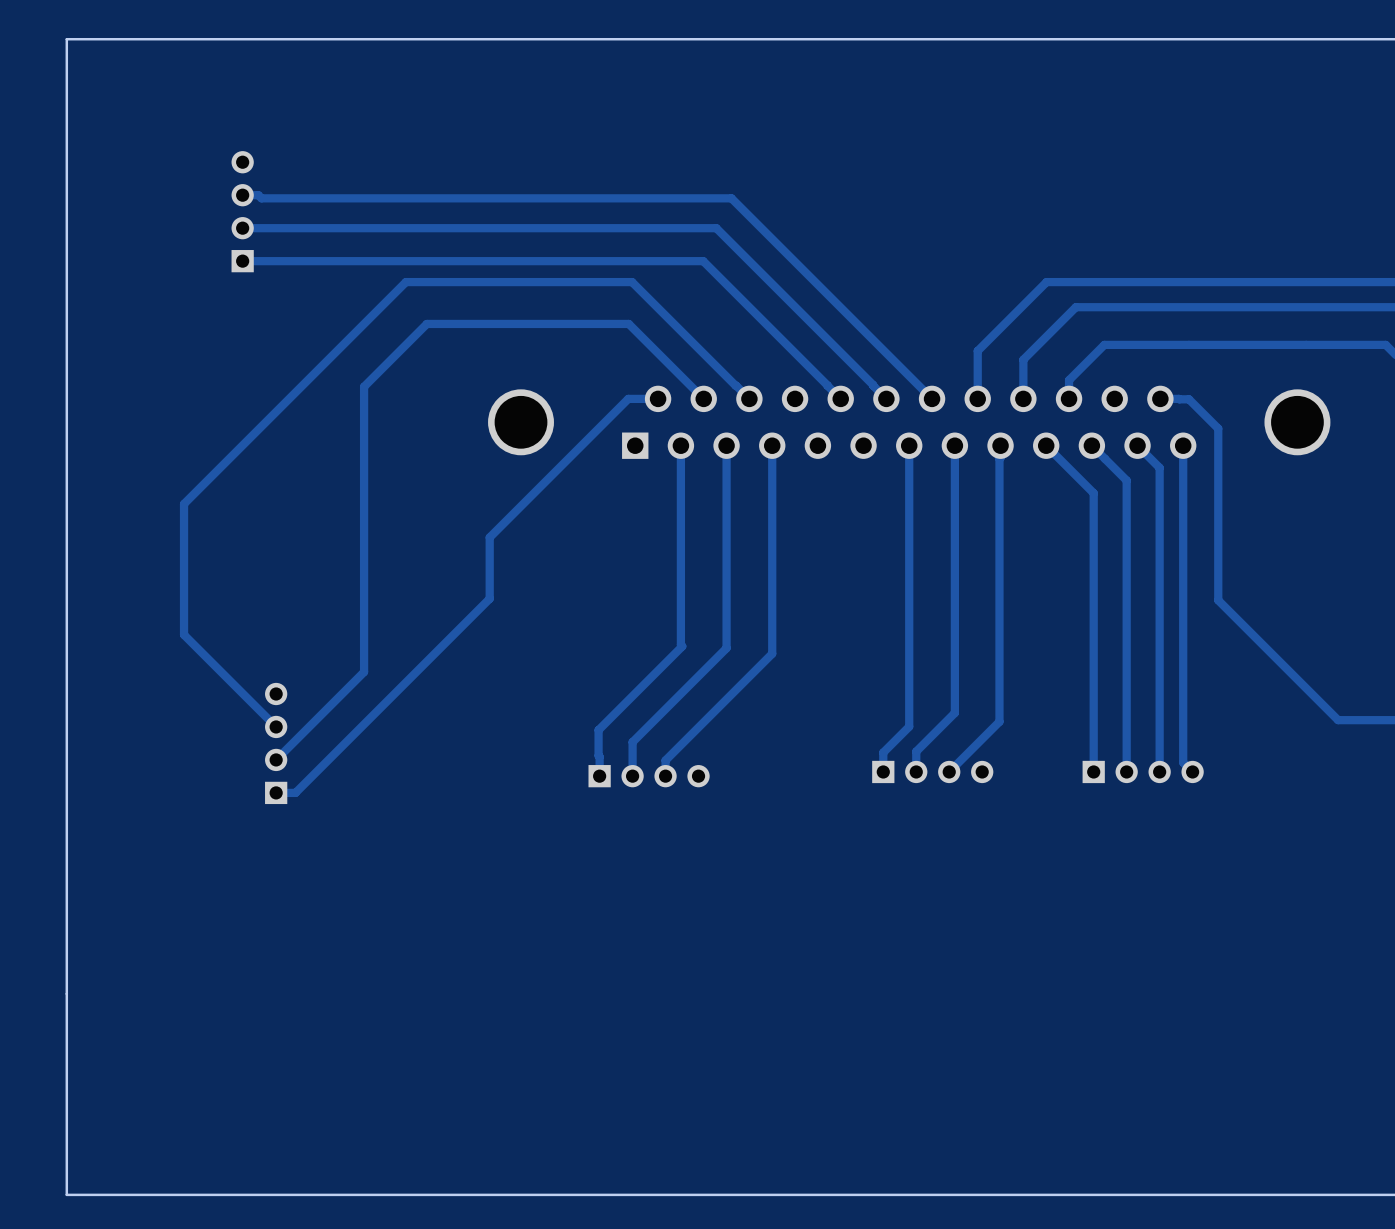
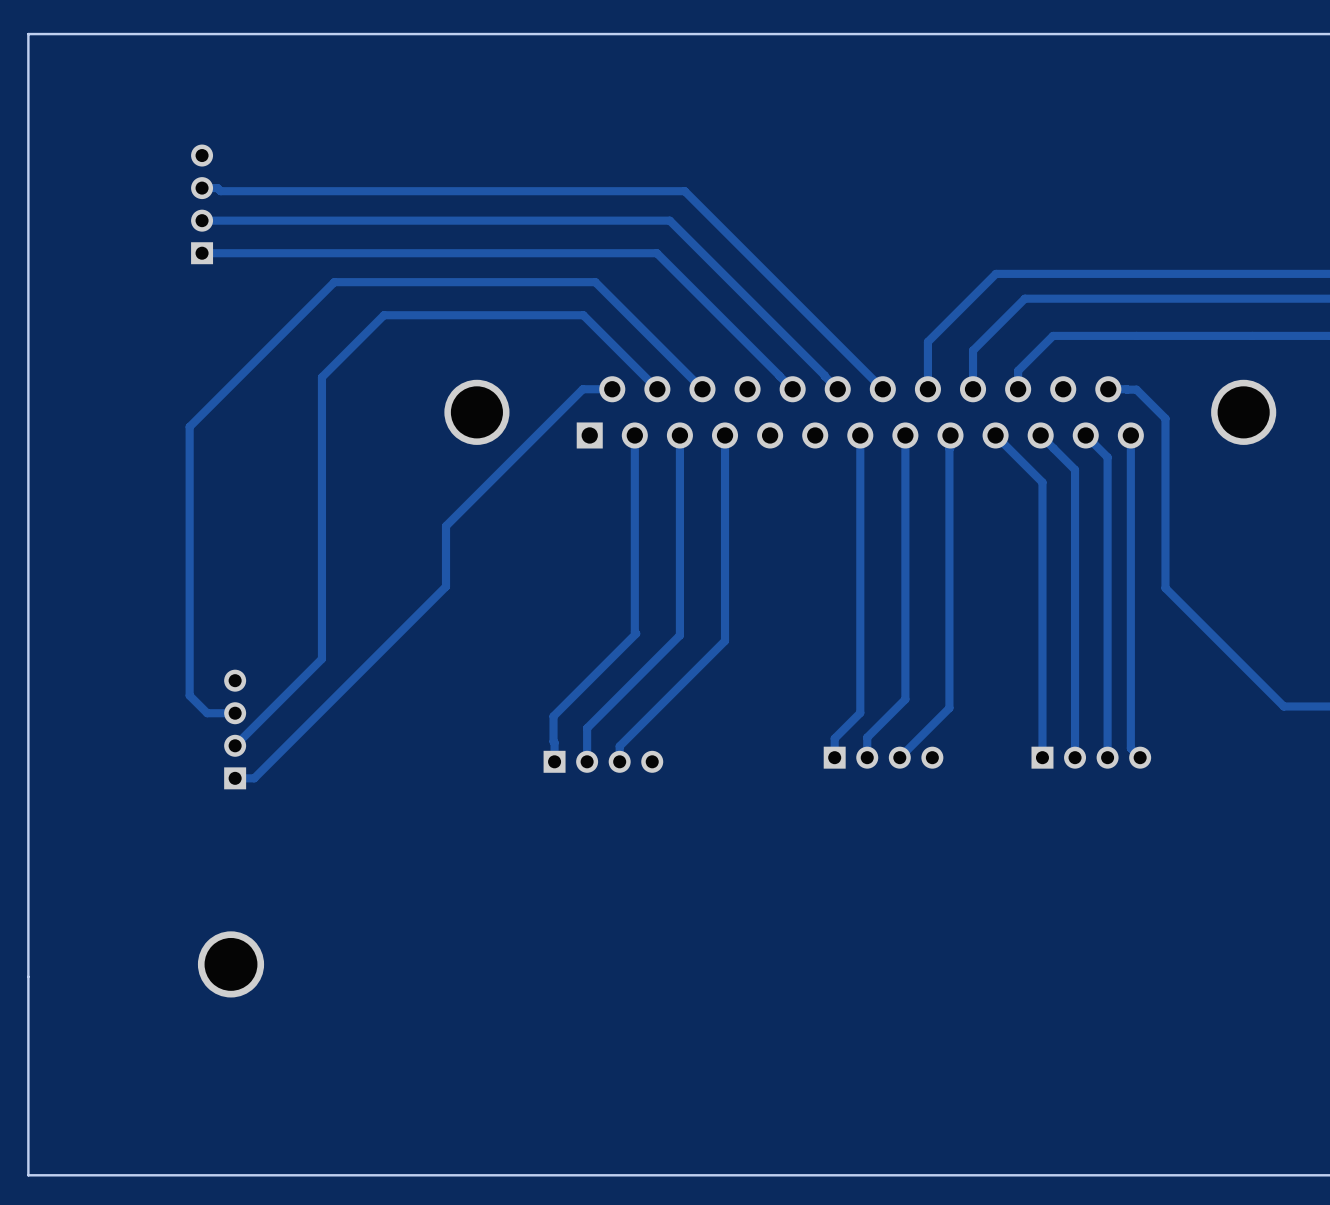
track: (736, 385) (632, 282) (405, 282) (184, 504) (184, 634) (276, 726) -> (689, 376) (595, 282) (334, 282) (189, 426) (189, 695) (207, 713) (235, 713)
part: none -> (231, 964)

